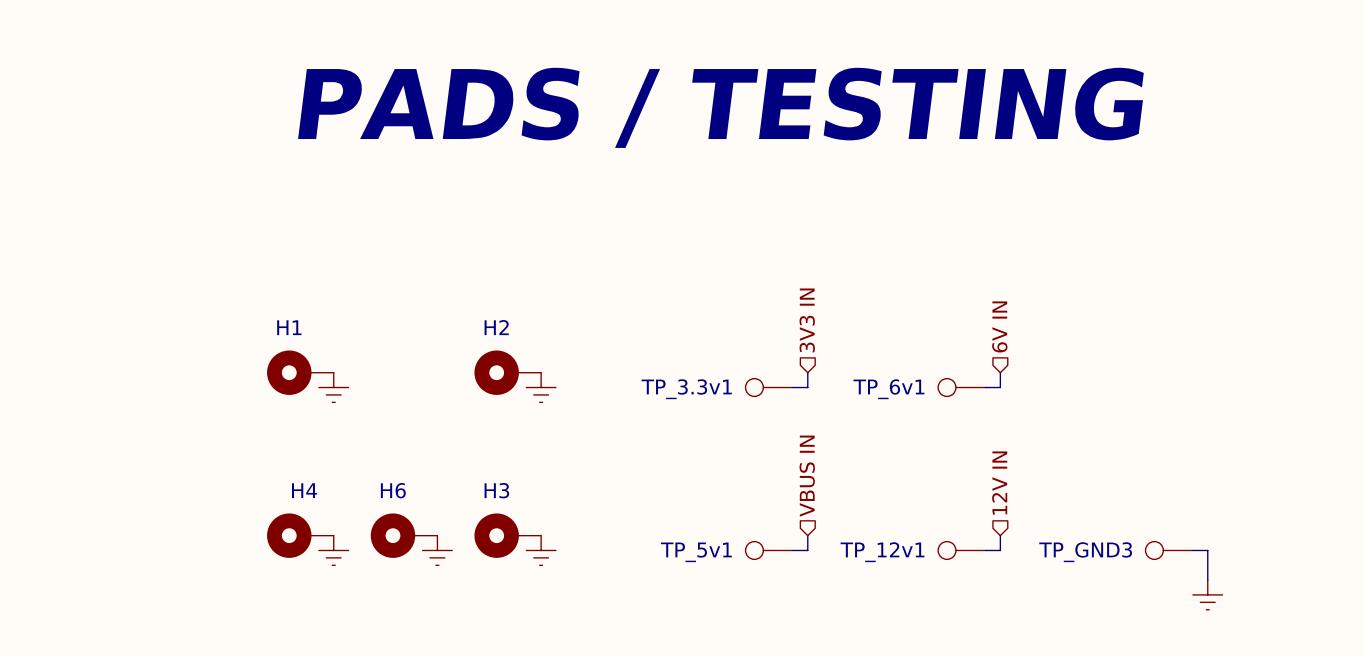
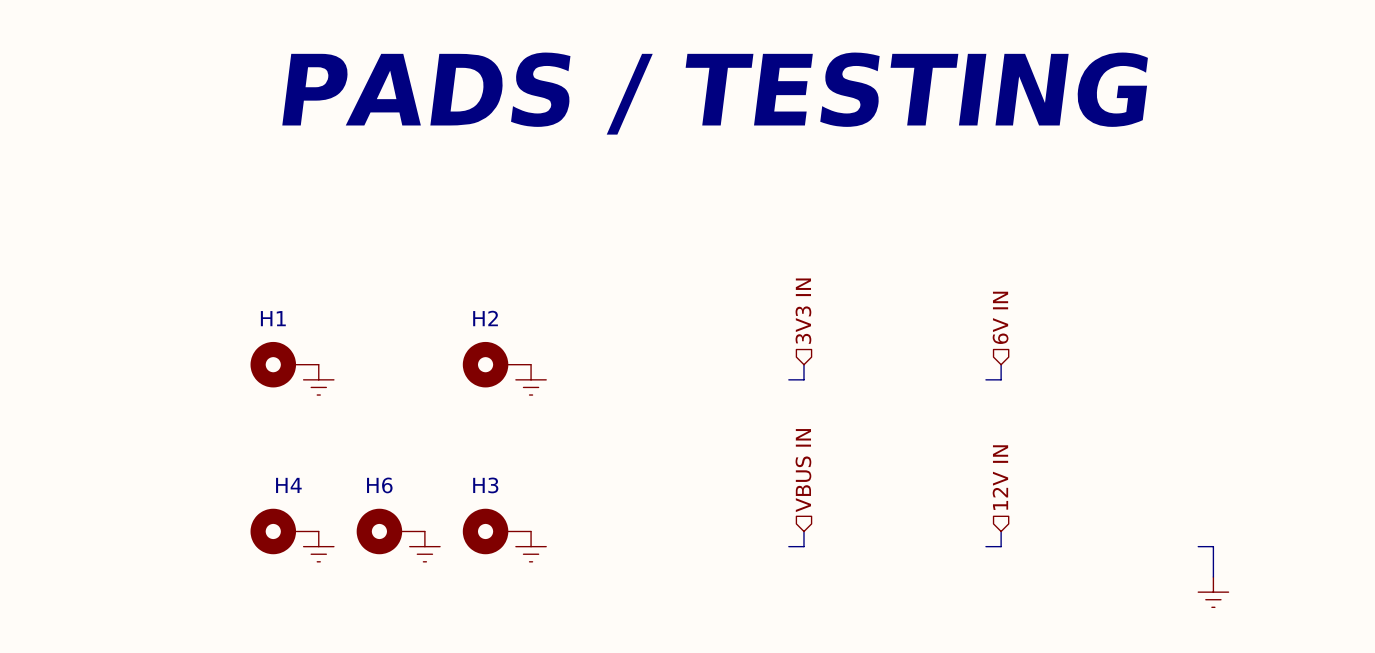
TP_3.3v1: (769, 387) -> none
TP_6v1: (961, 387) -> none
TP_5v1: (769, 550) -> none
TP_12v1: (961, 550) -> none
TP_GND3: (1169, 550) -> none

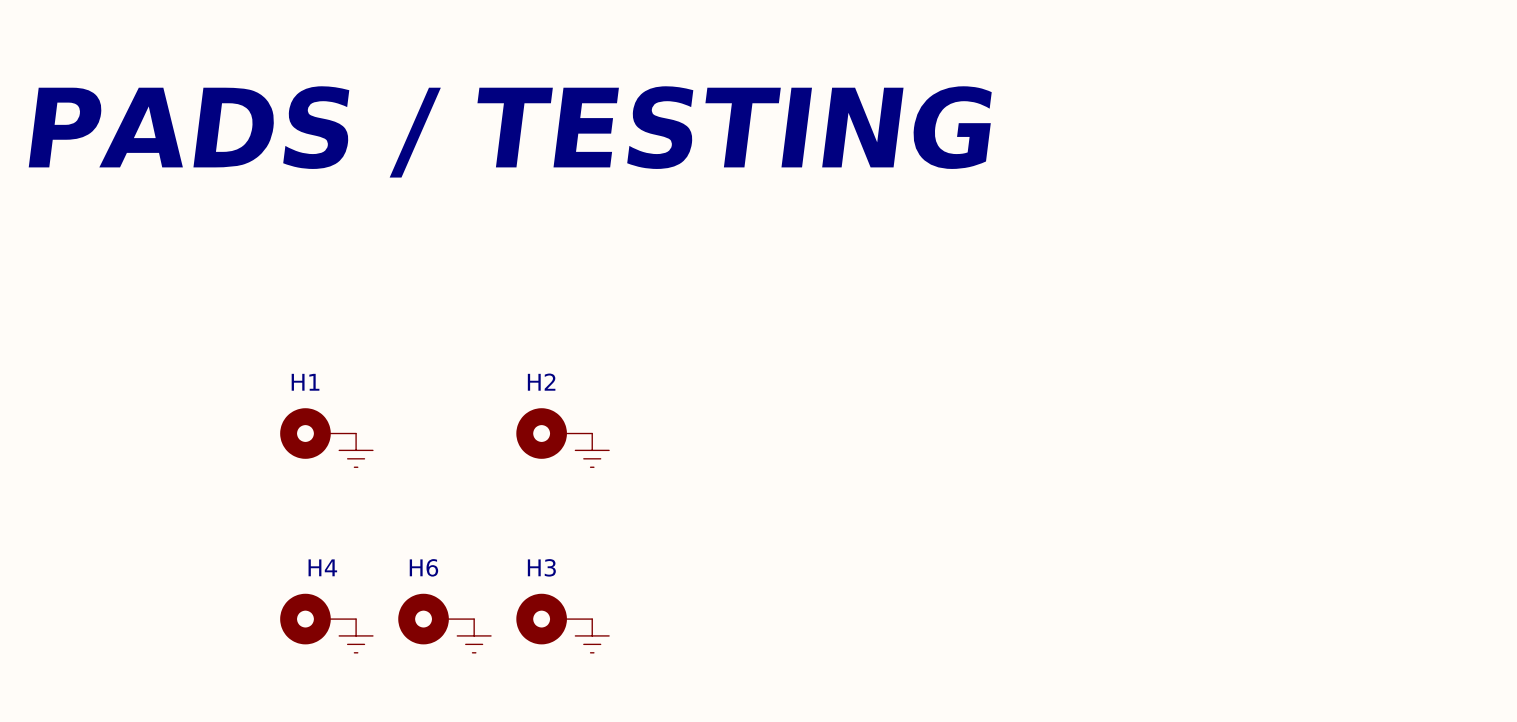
text position: PADS / TESTING (715, 93) -> PADS / TESTING (510, 131)
hierarchical label: 3V3 IN (803, 311) -> none
hierarchical label: 6V IN (1000, 317) -> none
wire: (803, 364) (803, 379) (788, 379) -> none
wire: (1001, 364) (1001, 379) (985, 379) -> none
hierarchical label: VBUS IN (803, 470) -> none
hierarchical label: 12V IN (1000, 477) -> none
wire: (803, 531) (803, 546) (788, 546) -> none
wire: (1001, 531) (1001, 546) (985, 546) -> none
wire: (1198, 546) (1213, 546) (1213, 576) -> none
power symbol: (1213, 592) -> none

